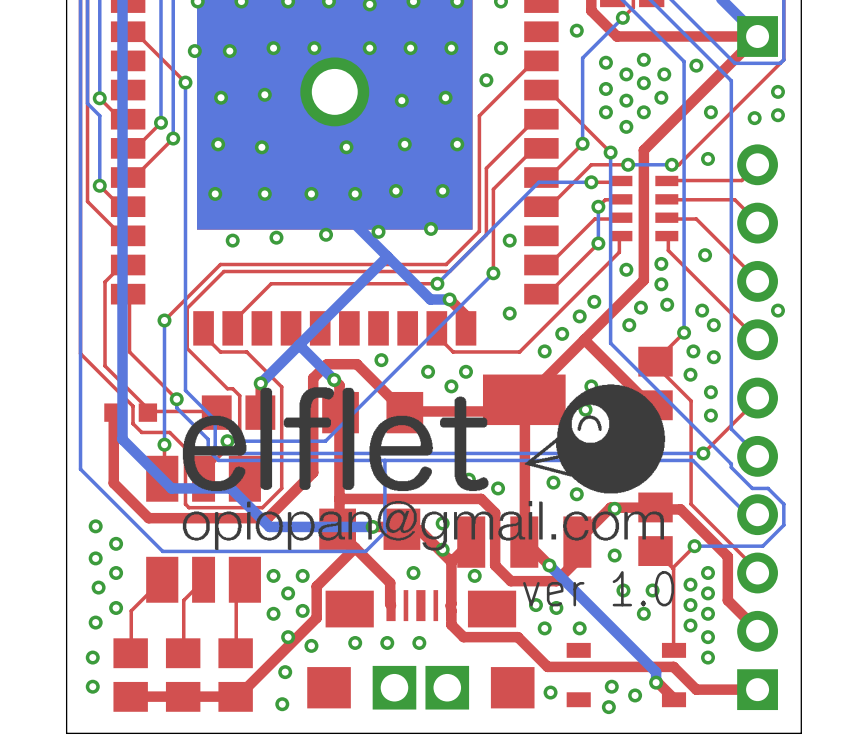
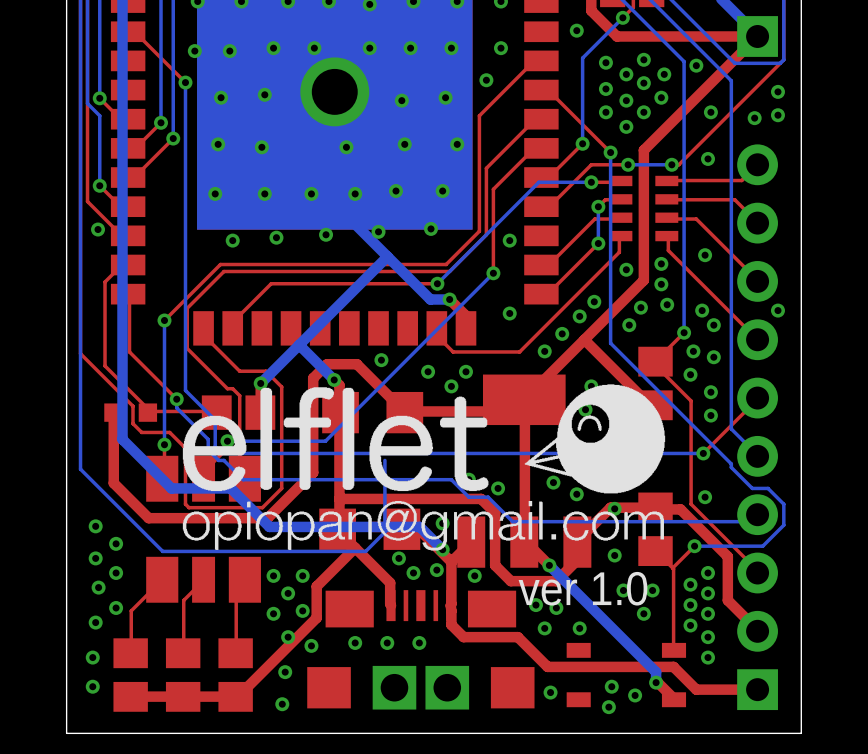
via: none -> (98, 229)
top track: (220, 351) (246, 351) (265, 371) -> (220, 351) (239, 371) (265, 371)
bottom track: (223, 460) (692, 460) (747, 514) (757, 514) -> (223, 460) (243, 479) (451, 479) (468, 497) (488, 497) (512, 521) (750, 521) (757, 514)
via: none -> (705, 497)
bottom track: none -> (372, 526) (419, 526) (442, 549)
via: (372, 526) -> none
via: none -> (398, 558)
via: none -> (436, 570)

